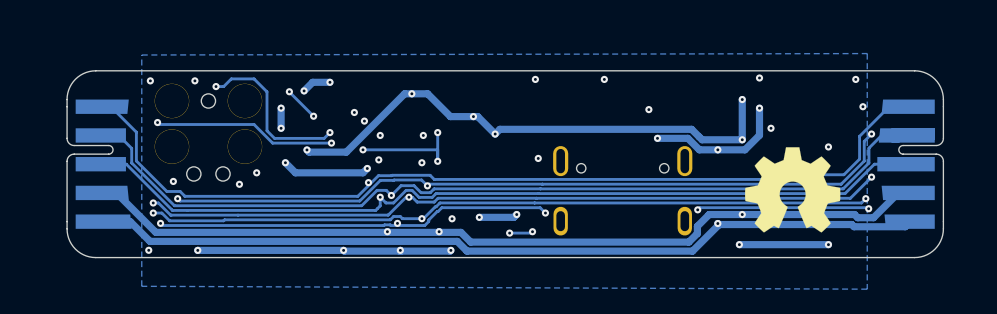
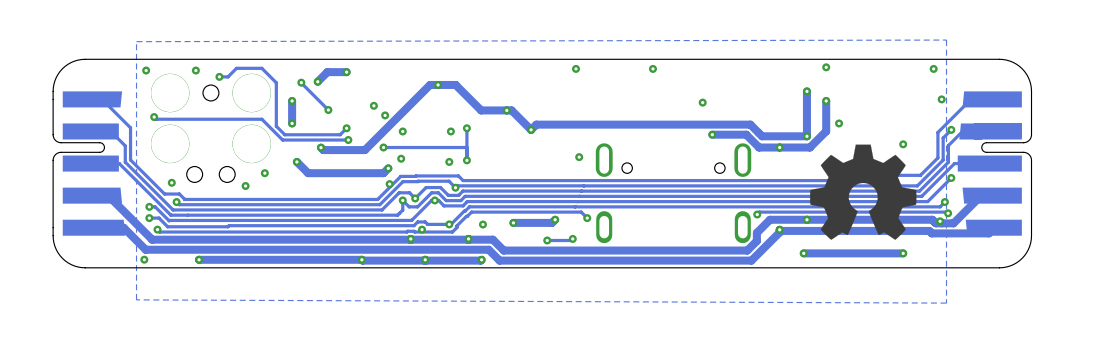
via: none -> (940, 221)

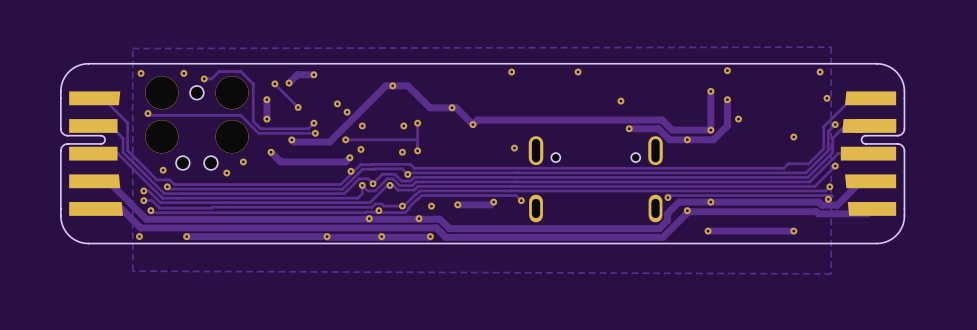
drawing: [810, 144, 917, 240] -> none
via: (948, 213) -> none
via: none -> (828, 199)
via: (940, 221) -> none
track: (572, 238) (547, 240) -> none
via: (572, 238) -> none
via: (547, 240) -> none

